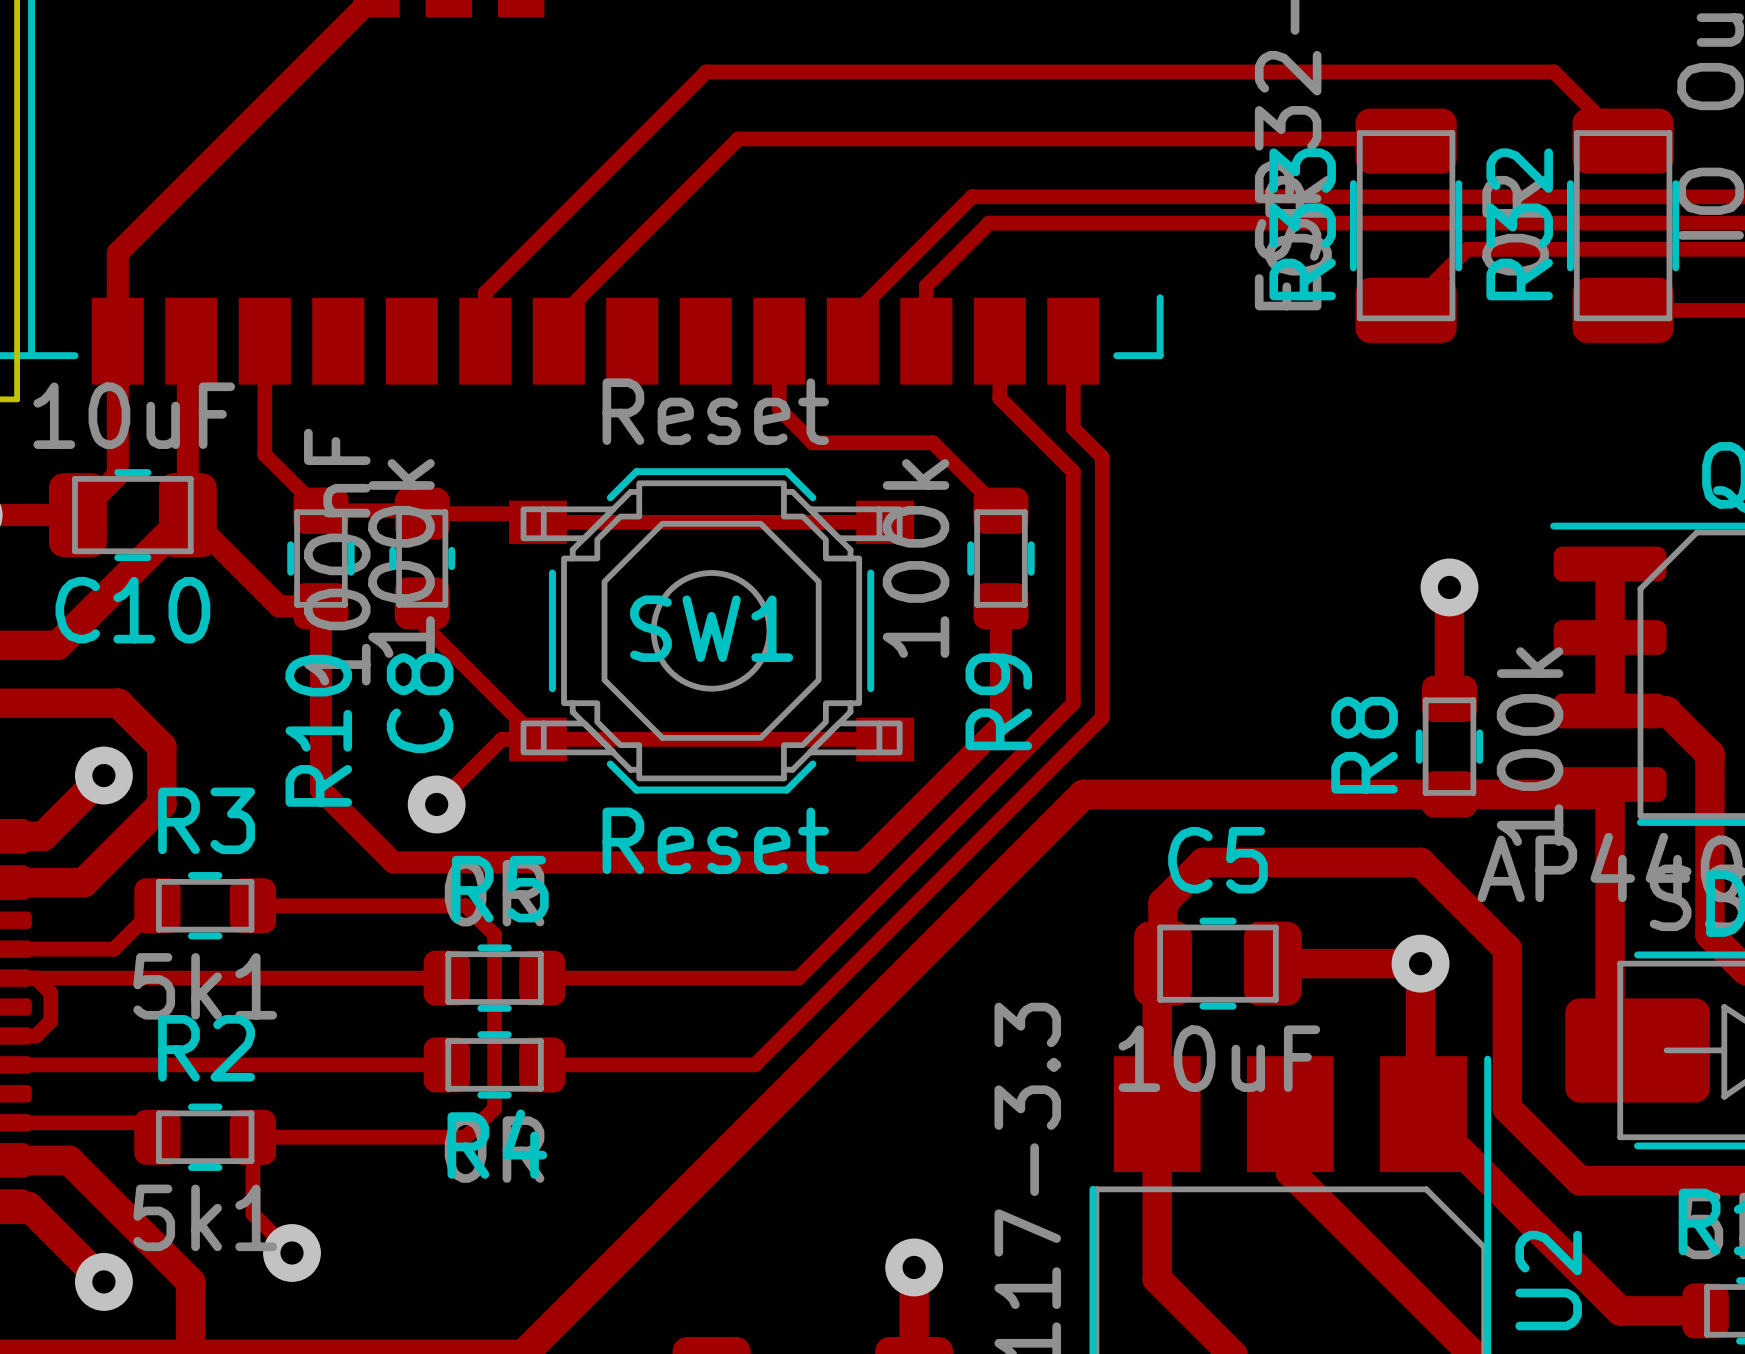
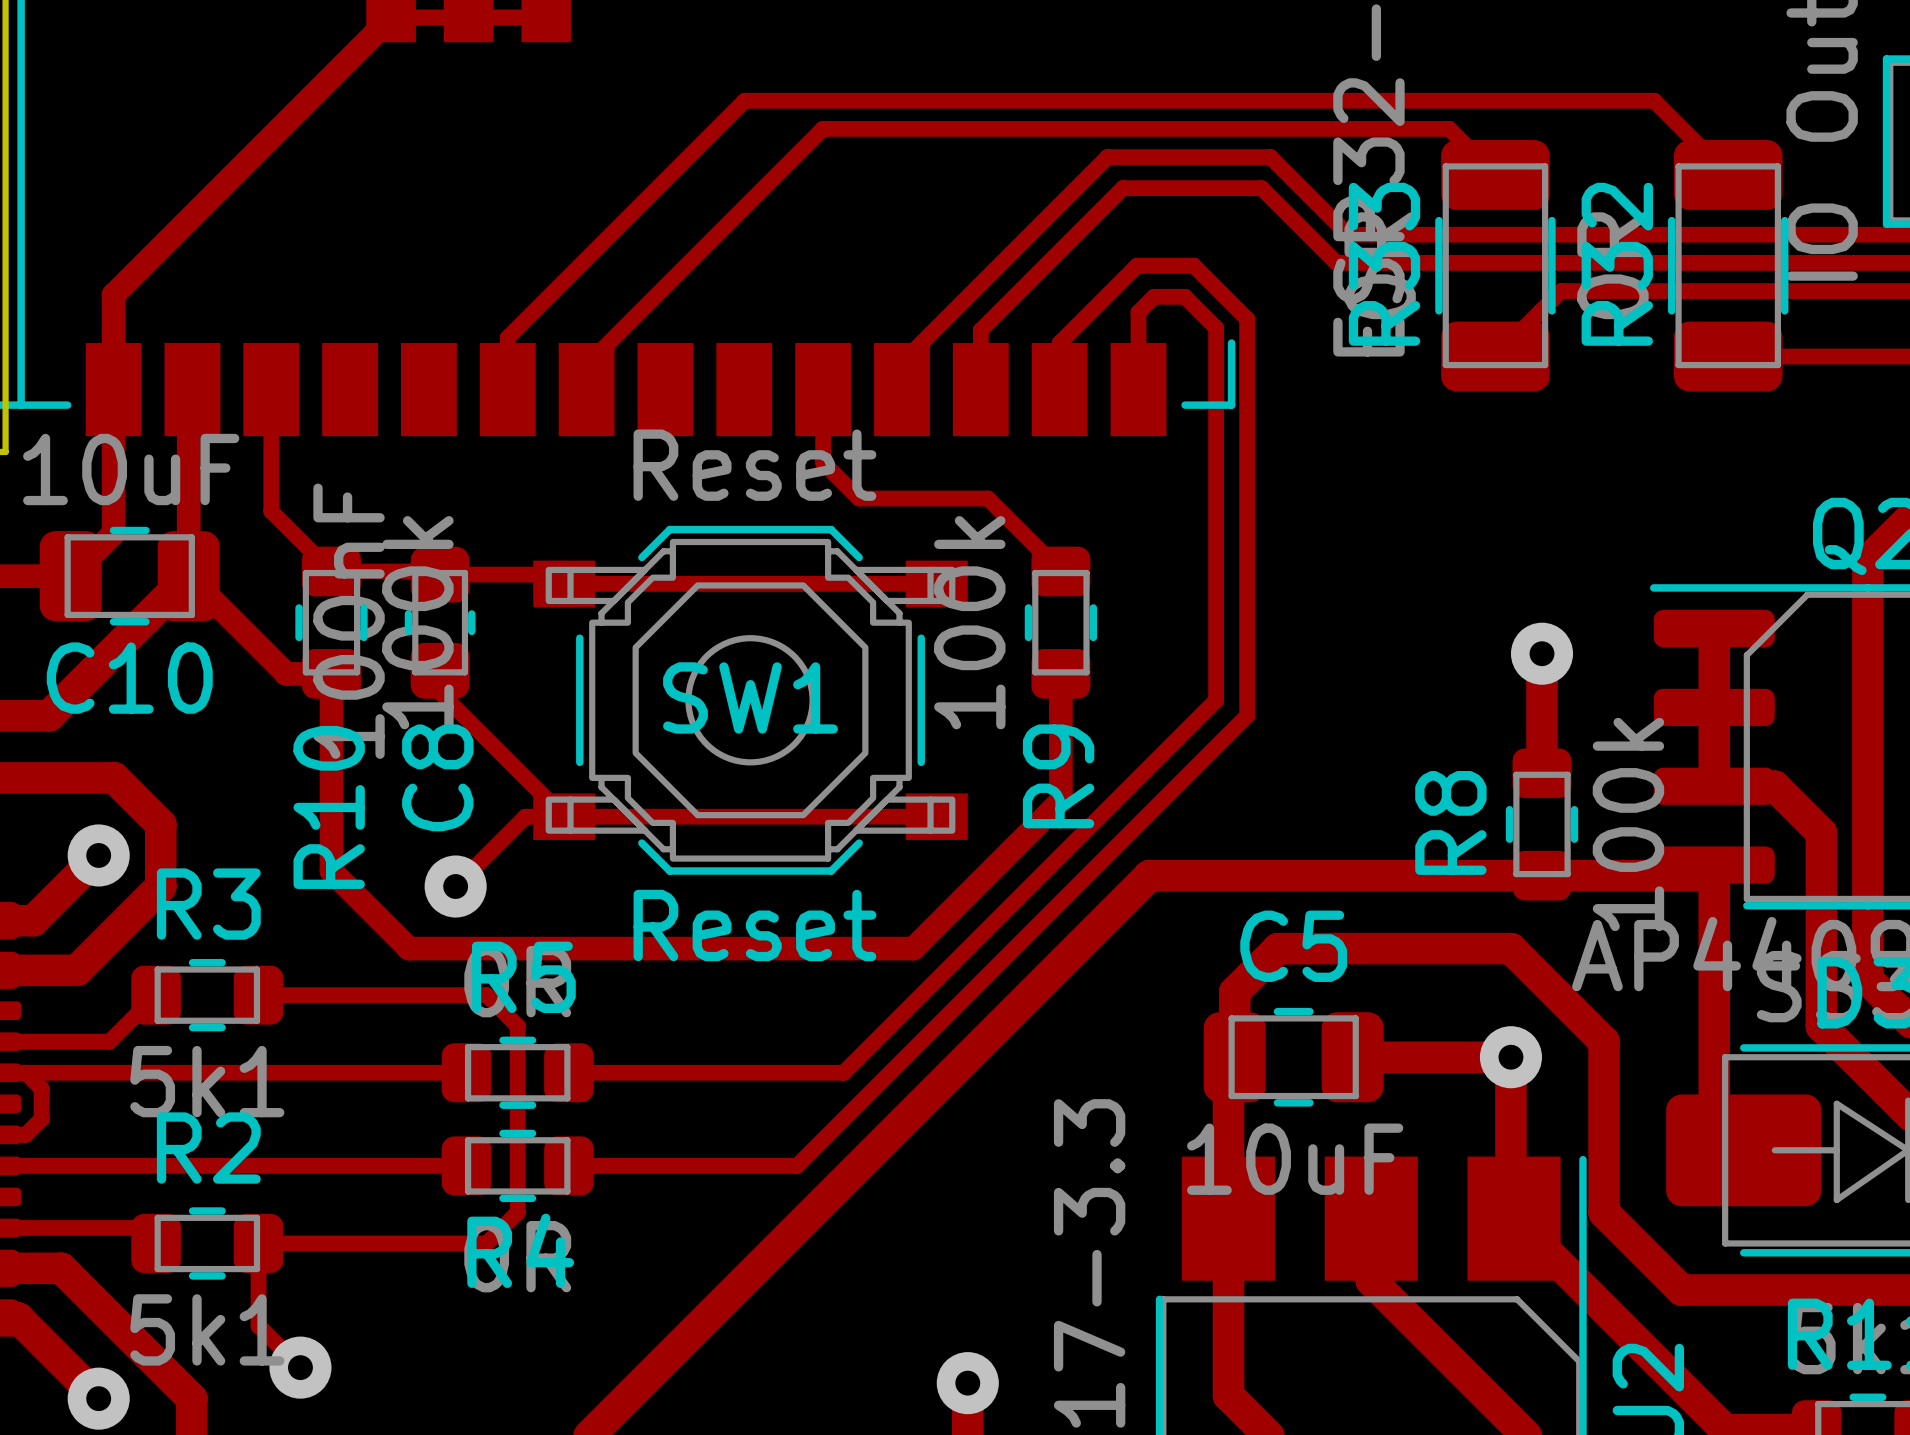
top track: (738, 138) (1403, 138) -> (779, 172) (822, 128) (1449, 128) (1493, 172)
top track: (972, 196) (1268, 196) -> (1029, 234) (1107, 157) (1270, 157) (1348, 234)
top track: (989, 223) (1257, 223) -> (1048, 262) (1122, 188) (1261, 188) (1336, 262)
top track: (999, 341) (999, 398) (1073, 471) (1073, 703) -> (1059, 389) (1059, 343) (1136, 265) (1193, 265) (1247, 319) (1247, 715) (1169, 793)
top track: (1073, 341) (1073, 428) (1102, 457) (1102, 717) -> (1138, 389) (1138, 312) (1154, 296) (1185, 296) (1216, 327) (1216, 700) (1138, 777)

